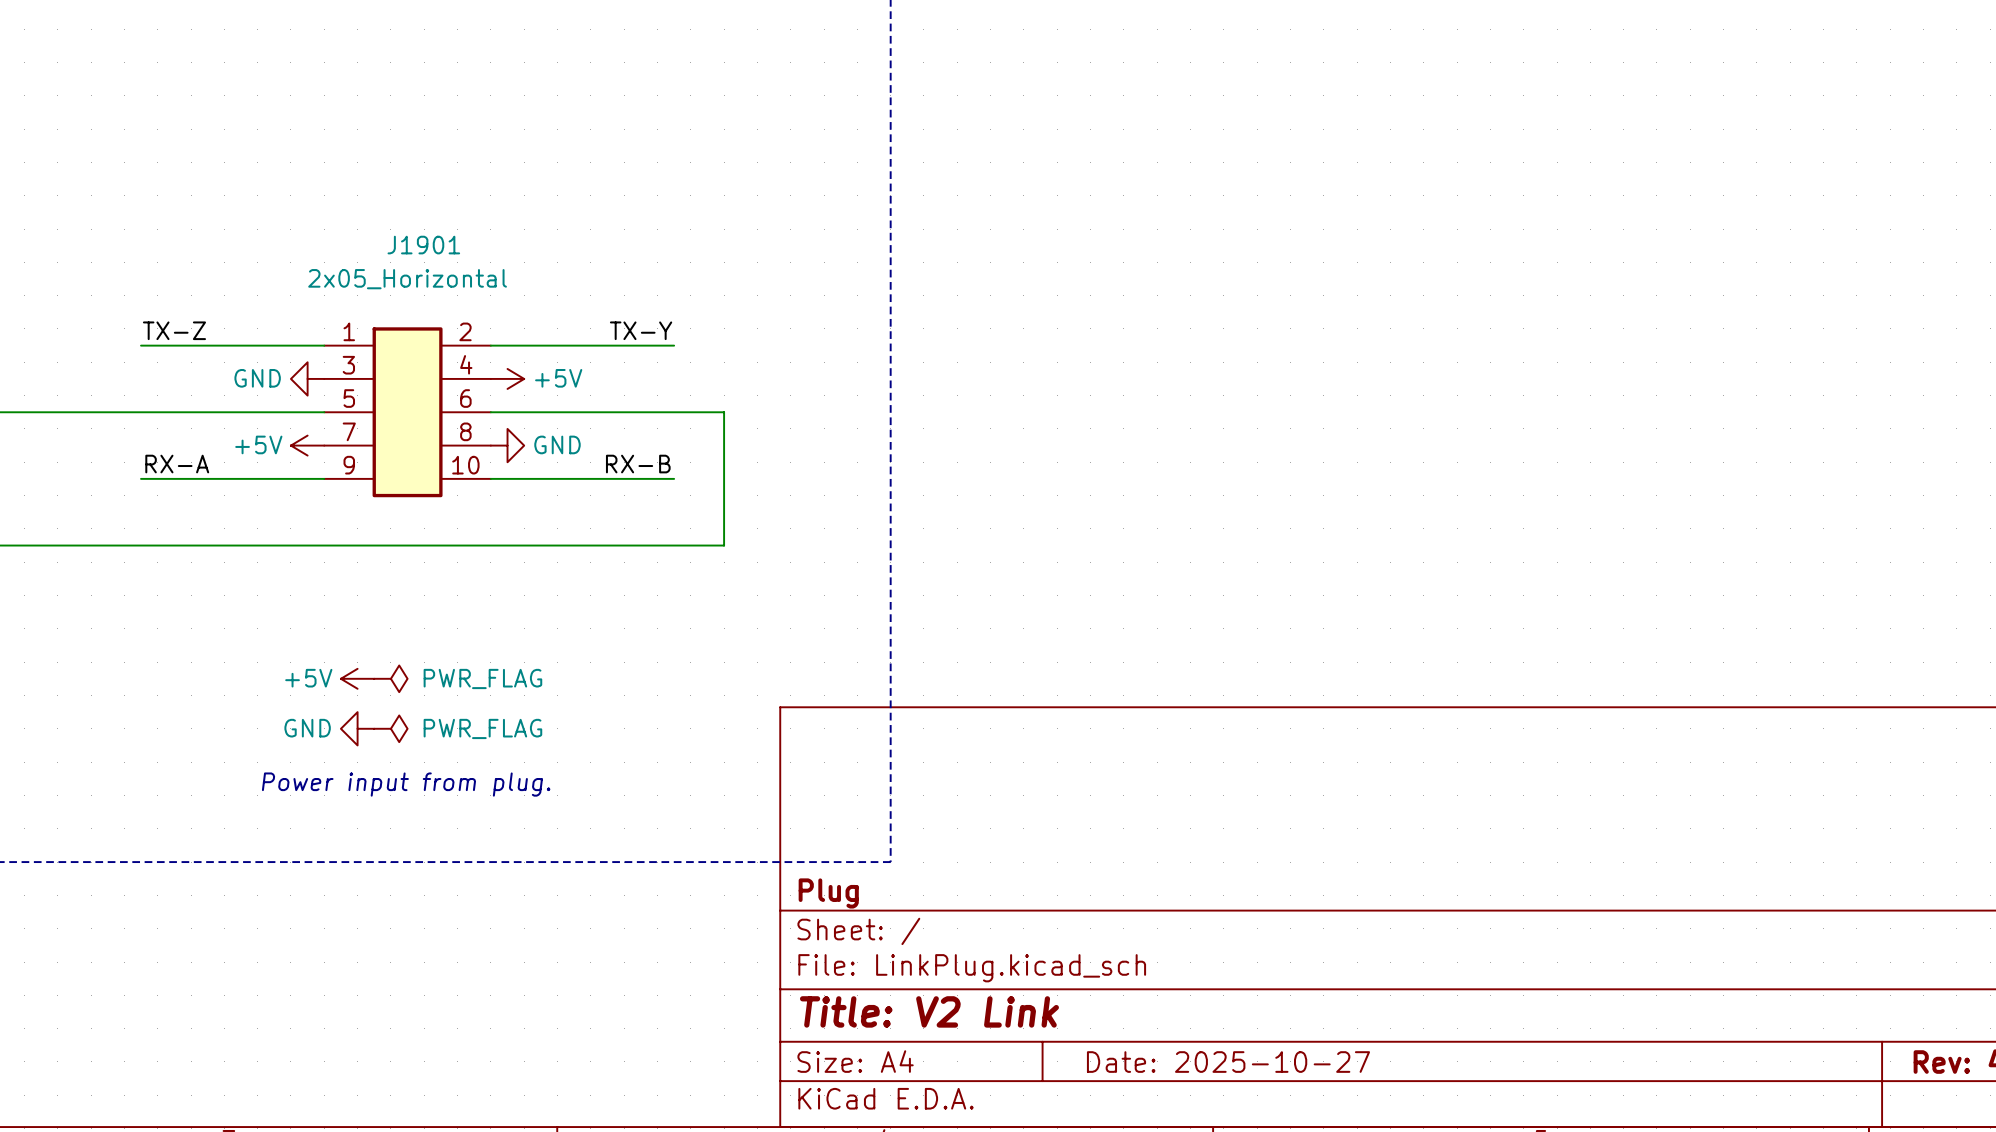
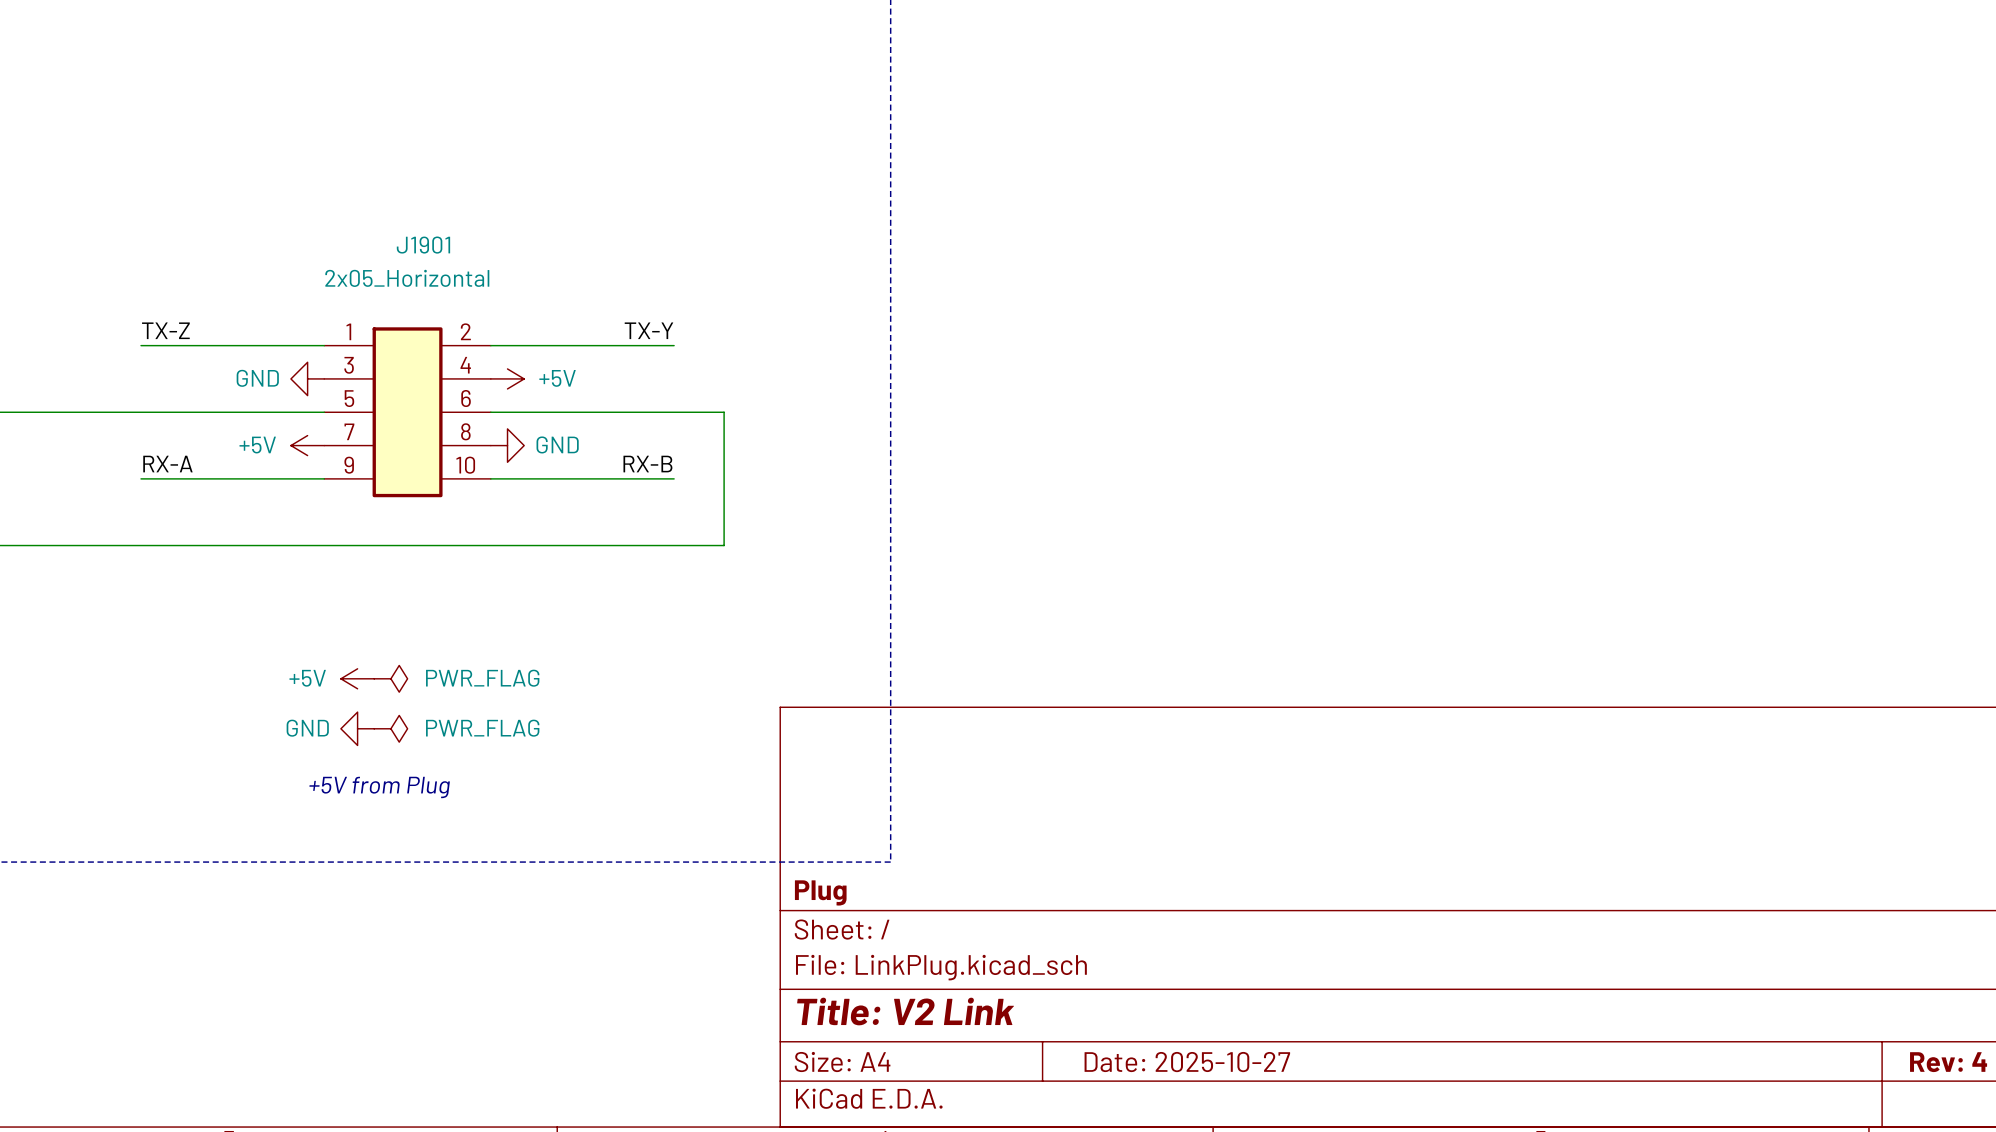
text: Power input from plug. (406, 784) -> none
text: none -> +5V from Plug (379, 787)

